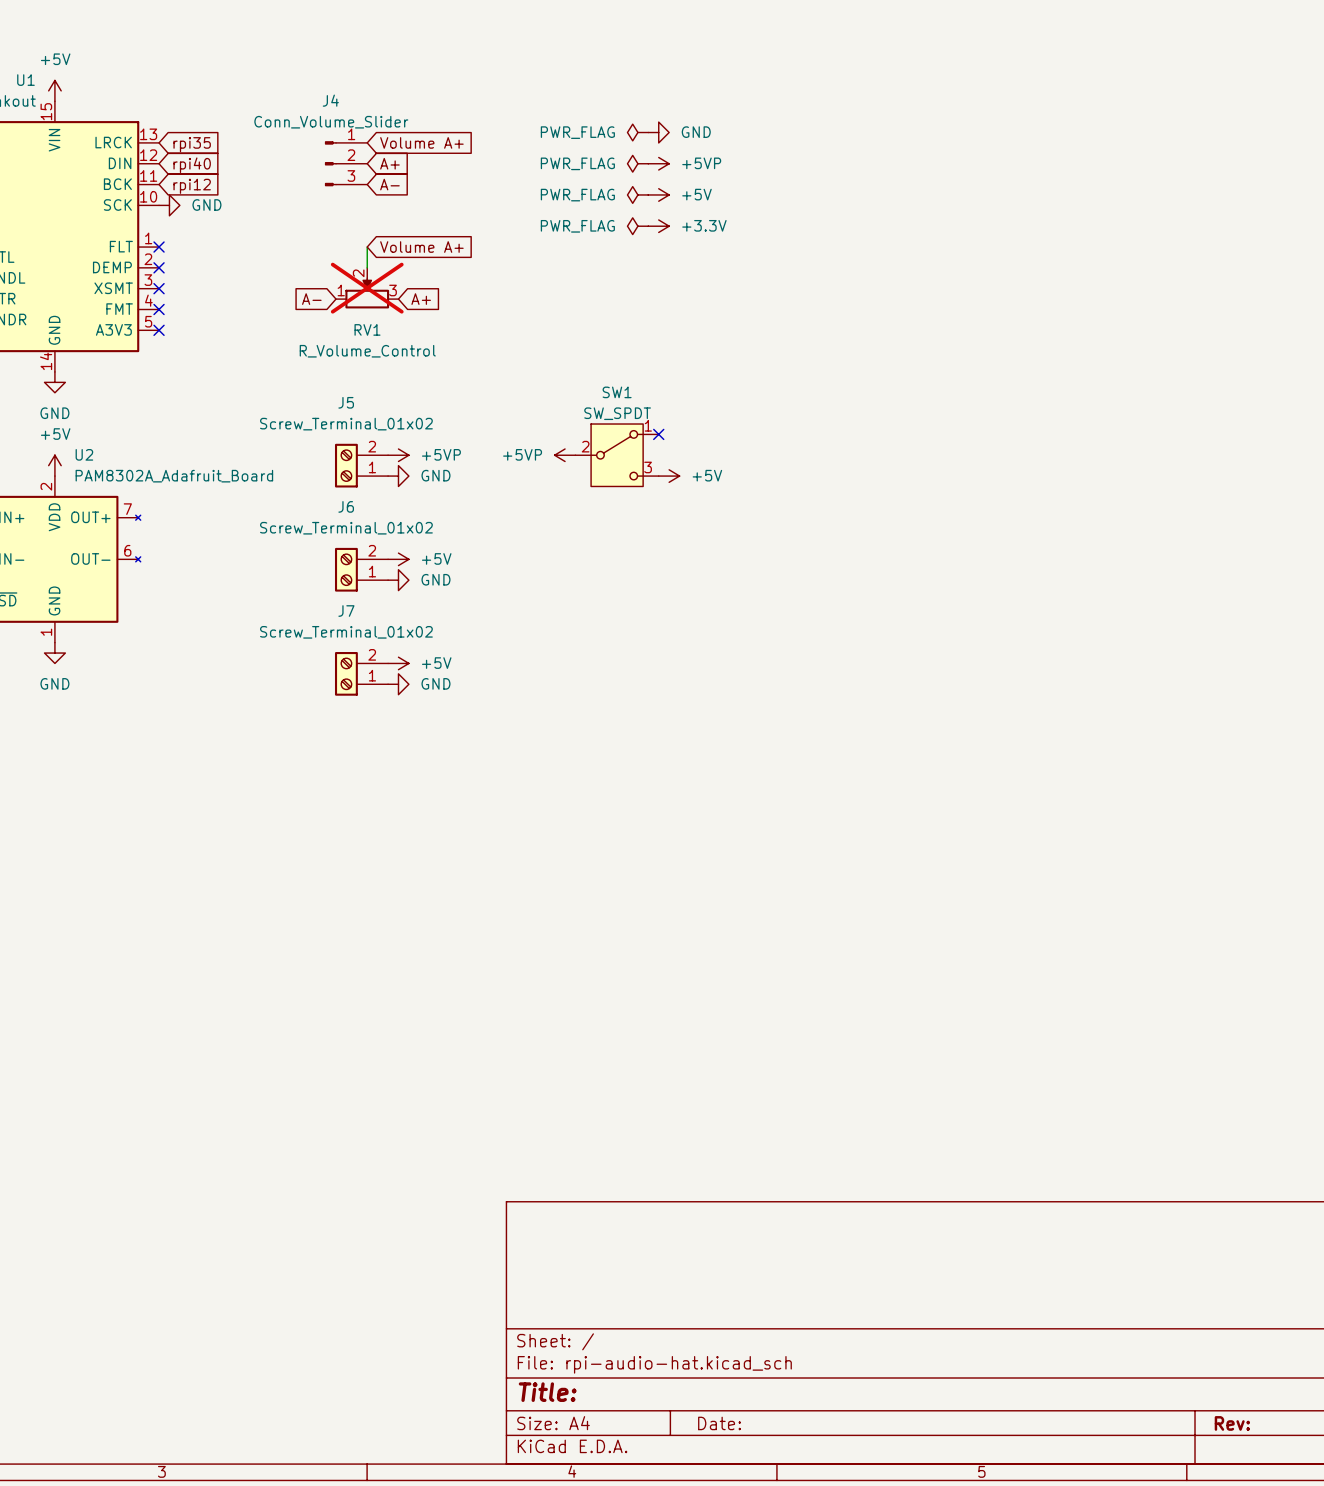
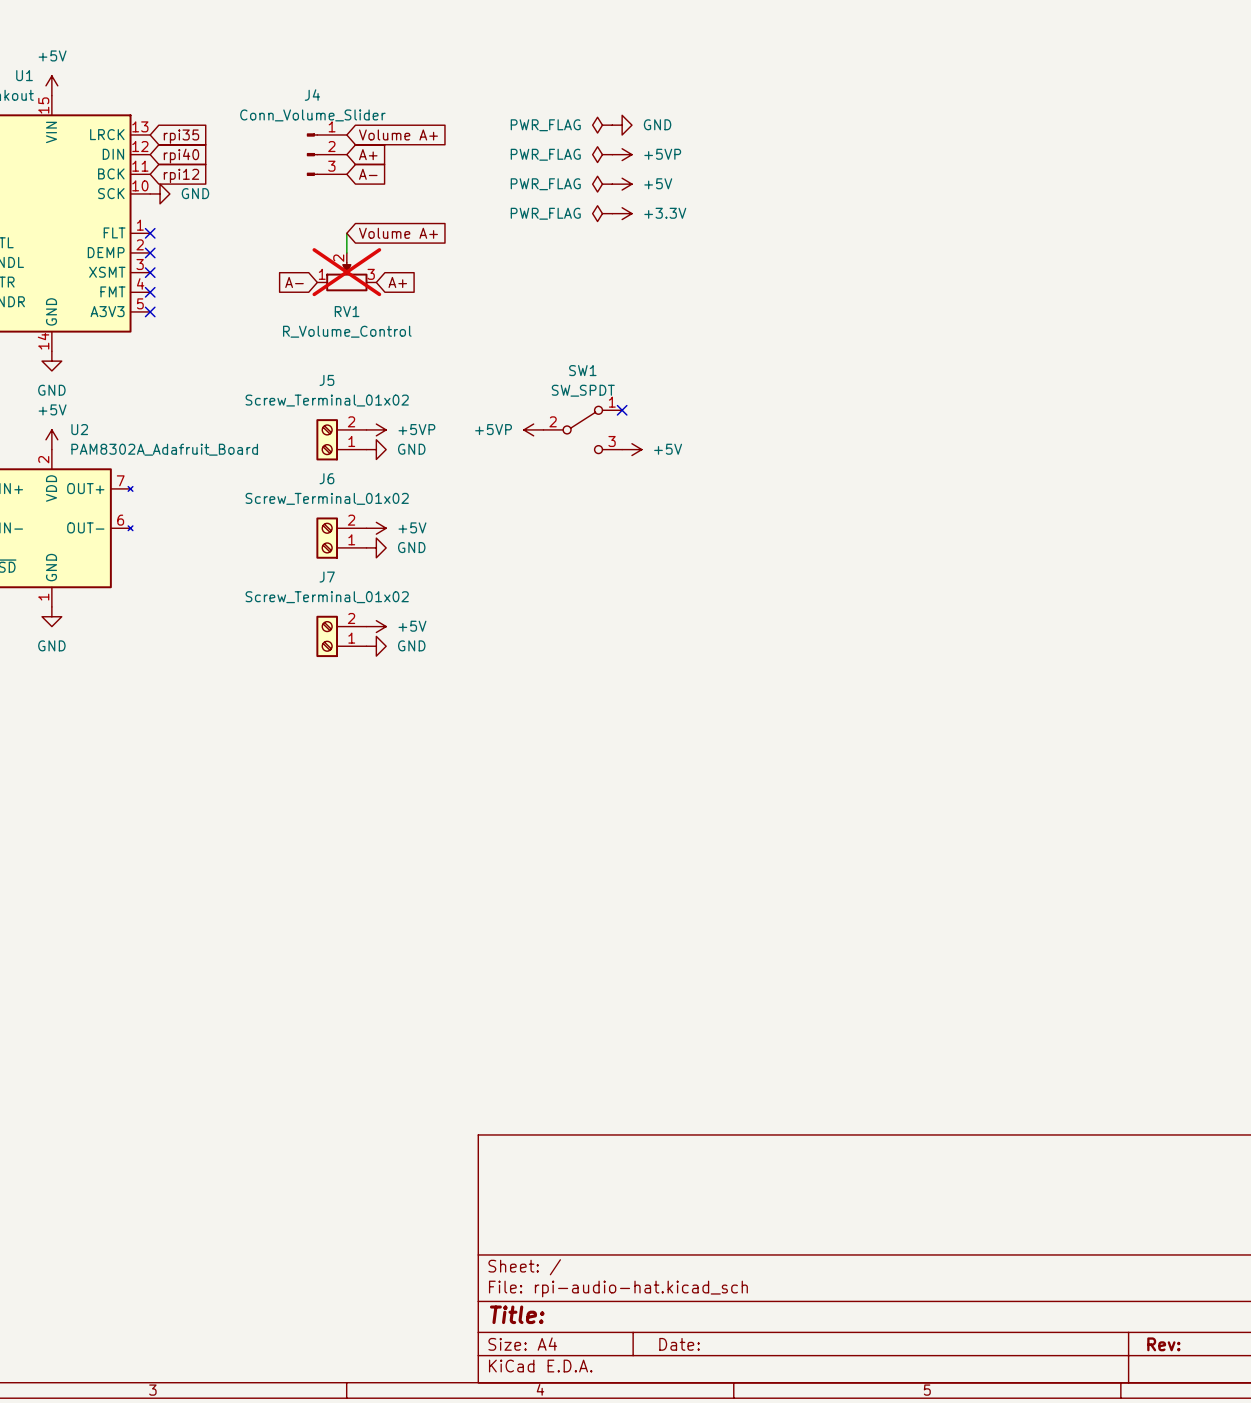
SW1 symbol: [575, 424, 659, 487] -> [543, 406, 623, 454]

